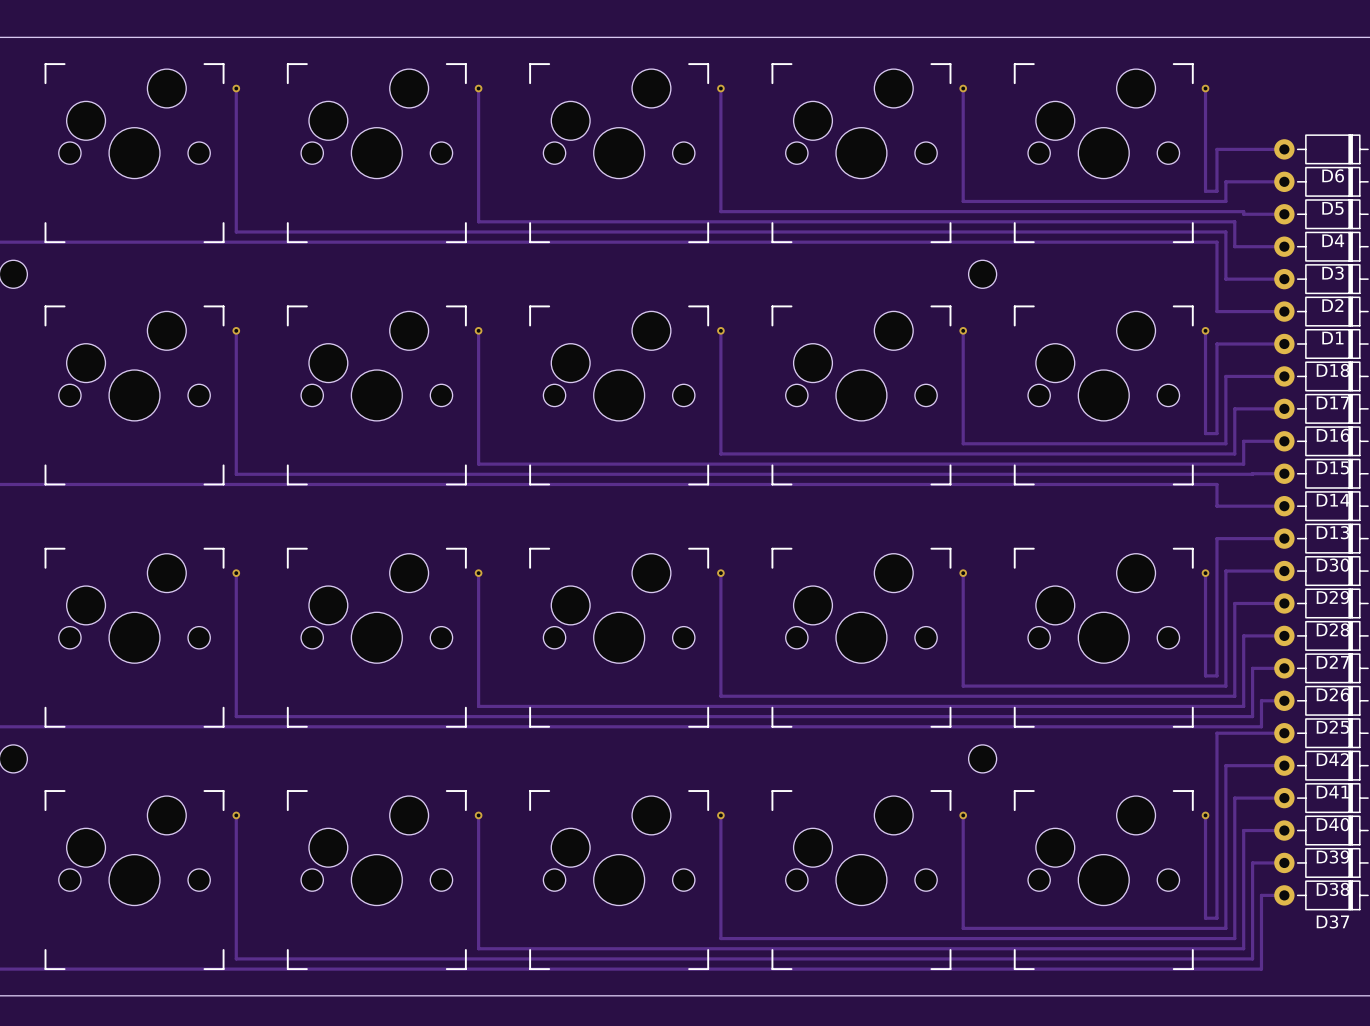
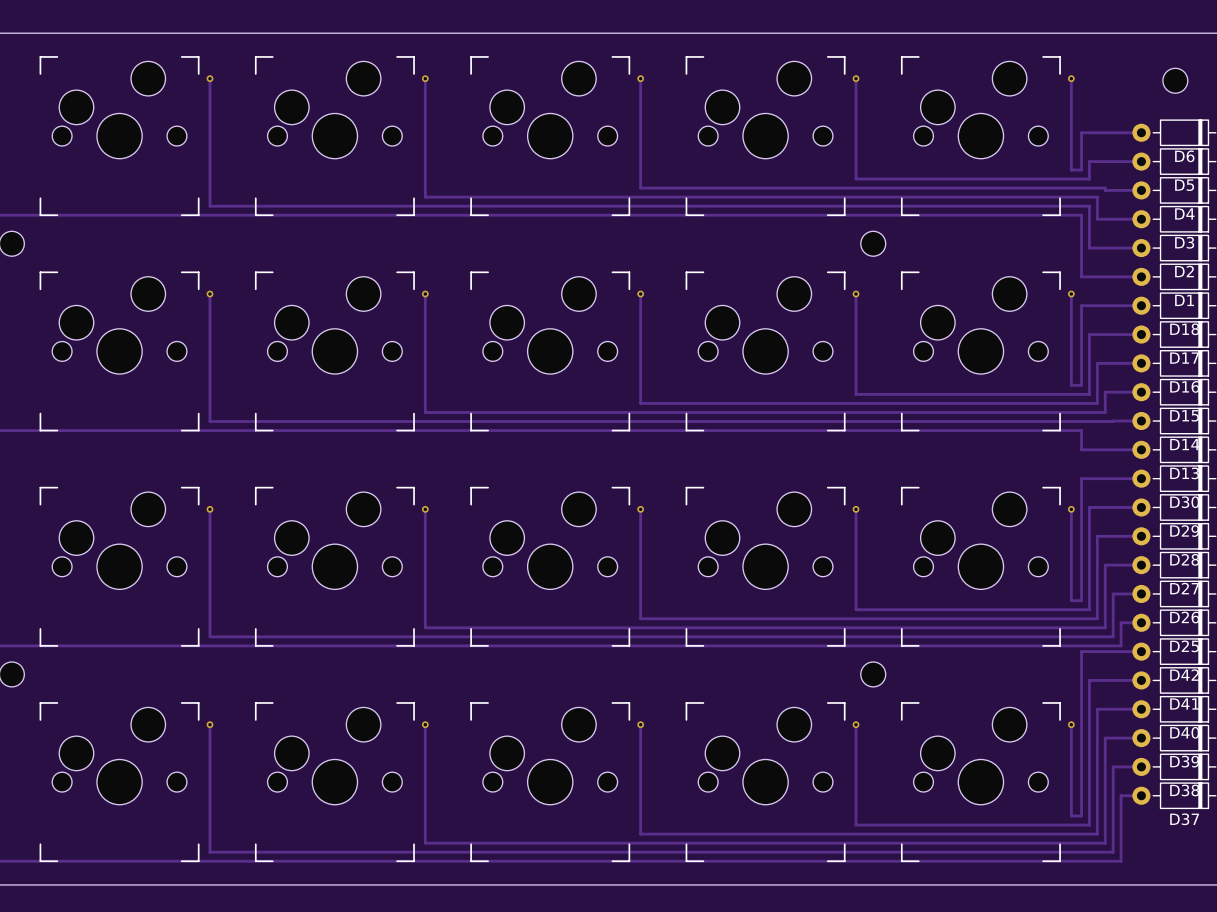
part: none -> (1175, 80)

